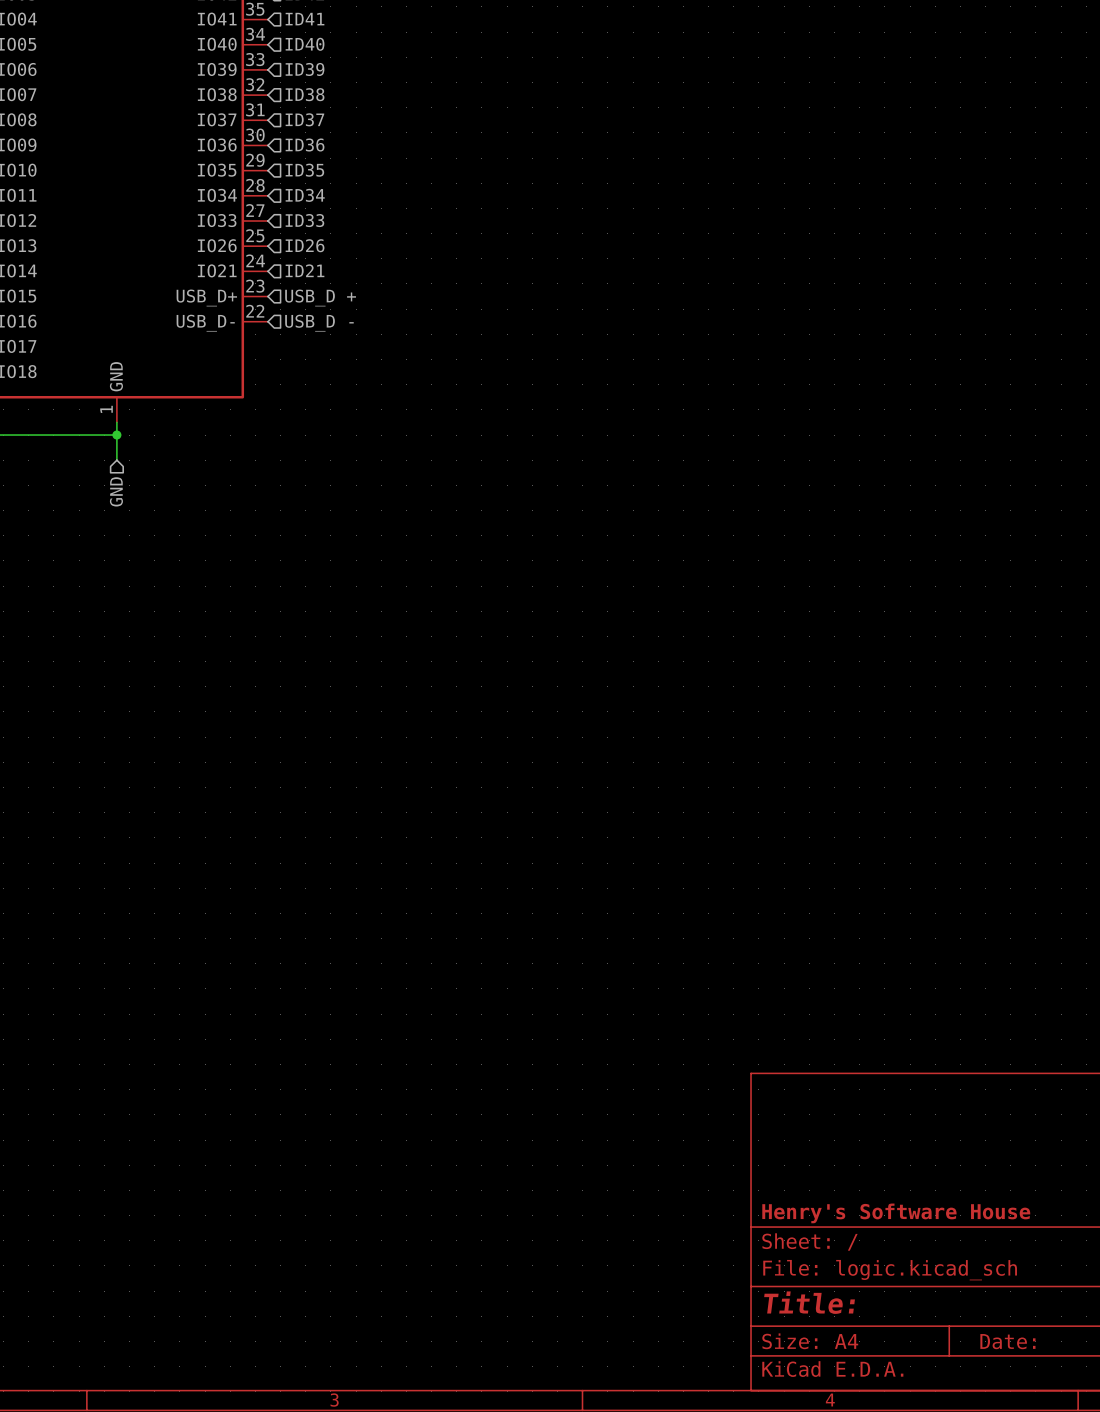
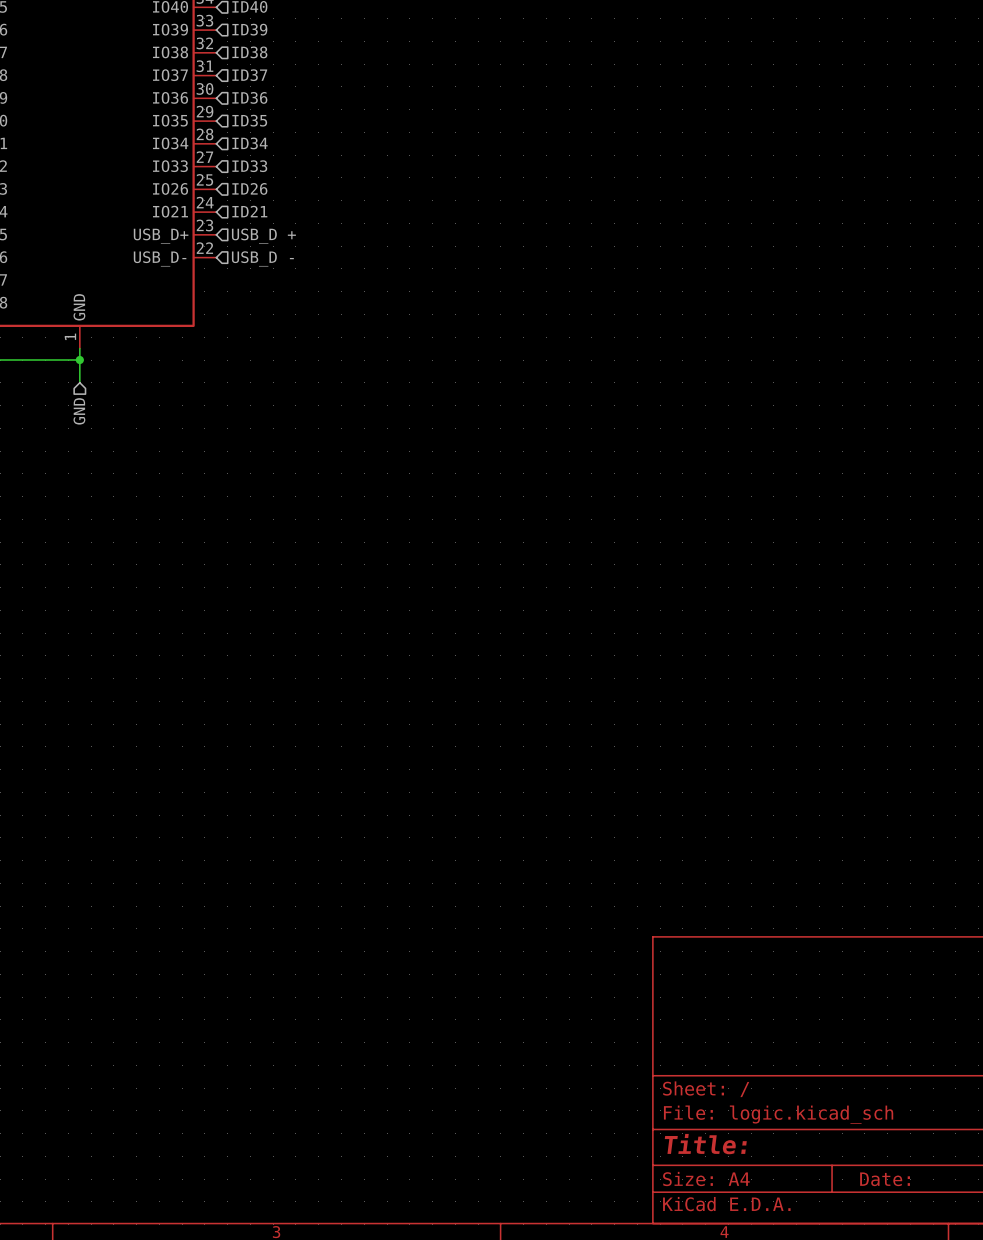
title block: Henry's Software House (896, 1213) -> none

